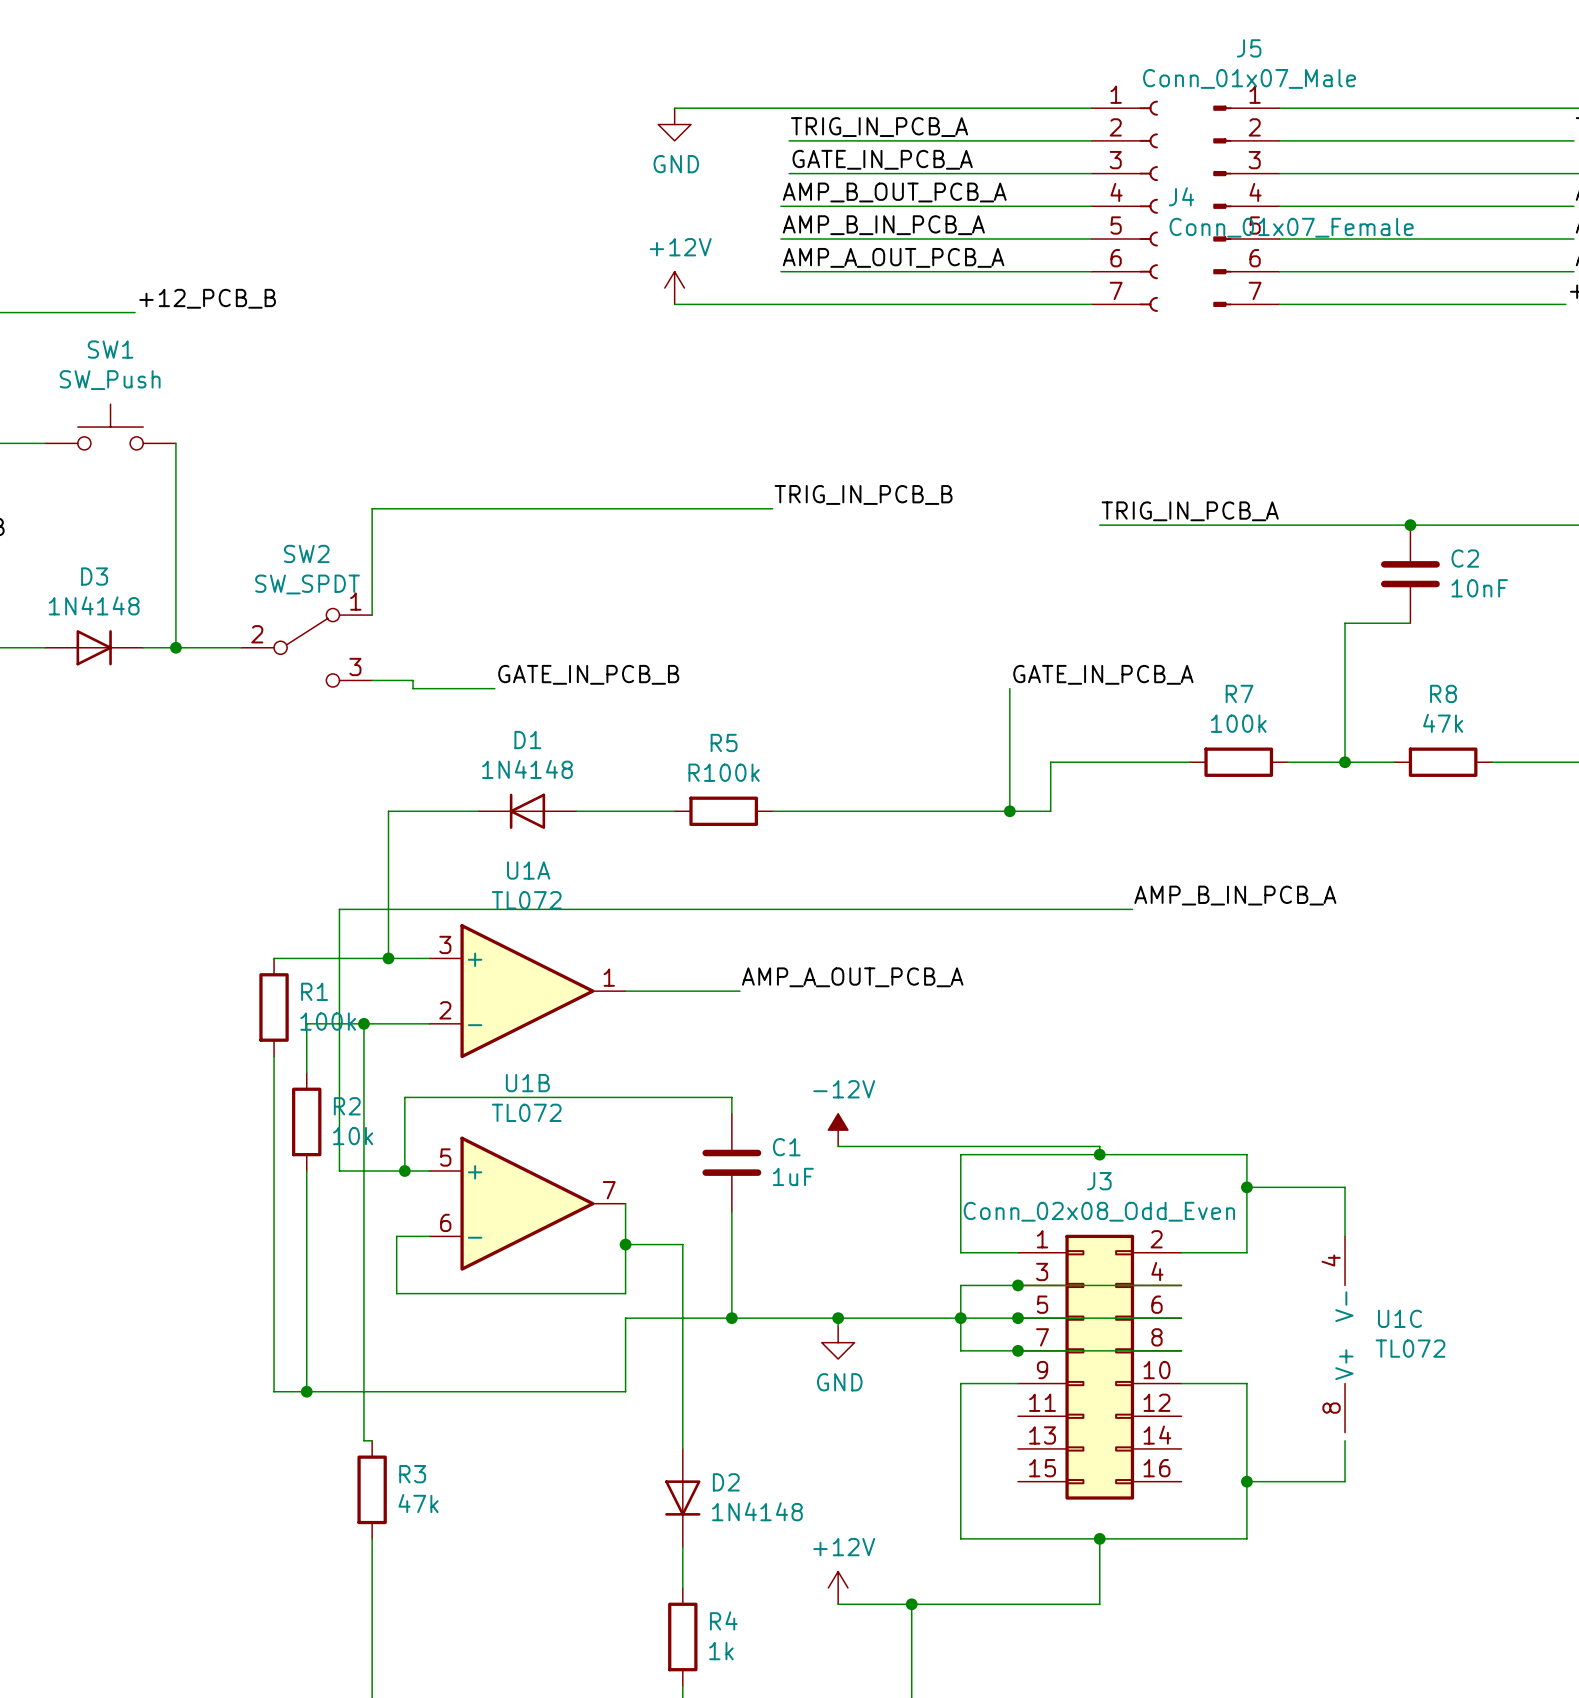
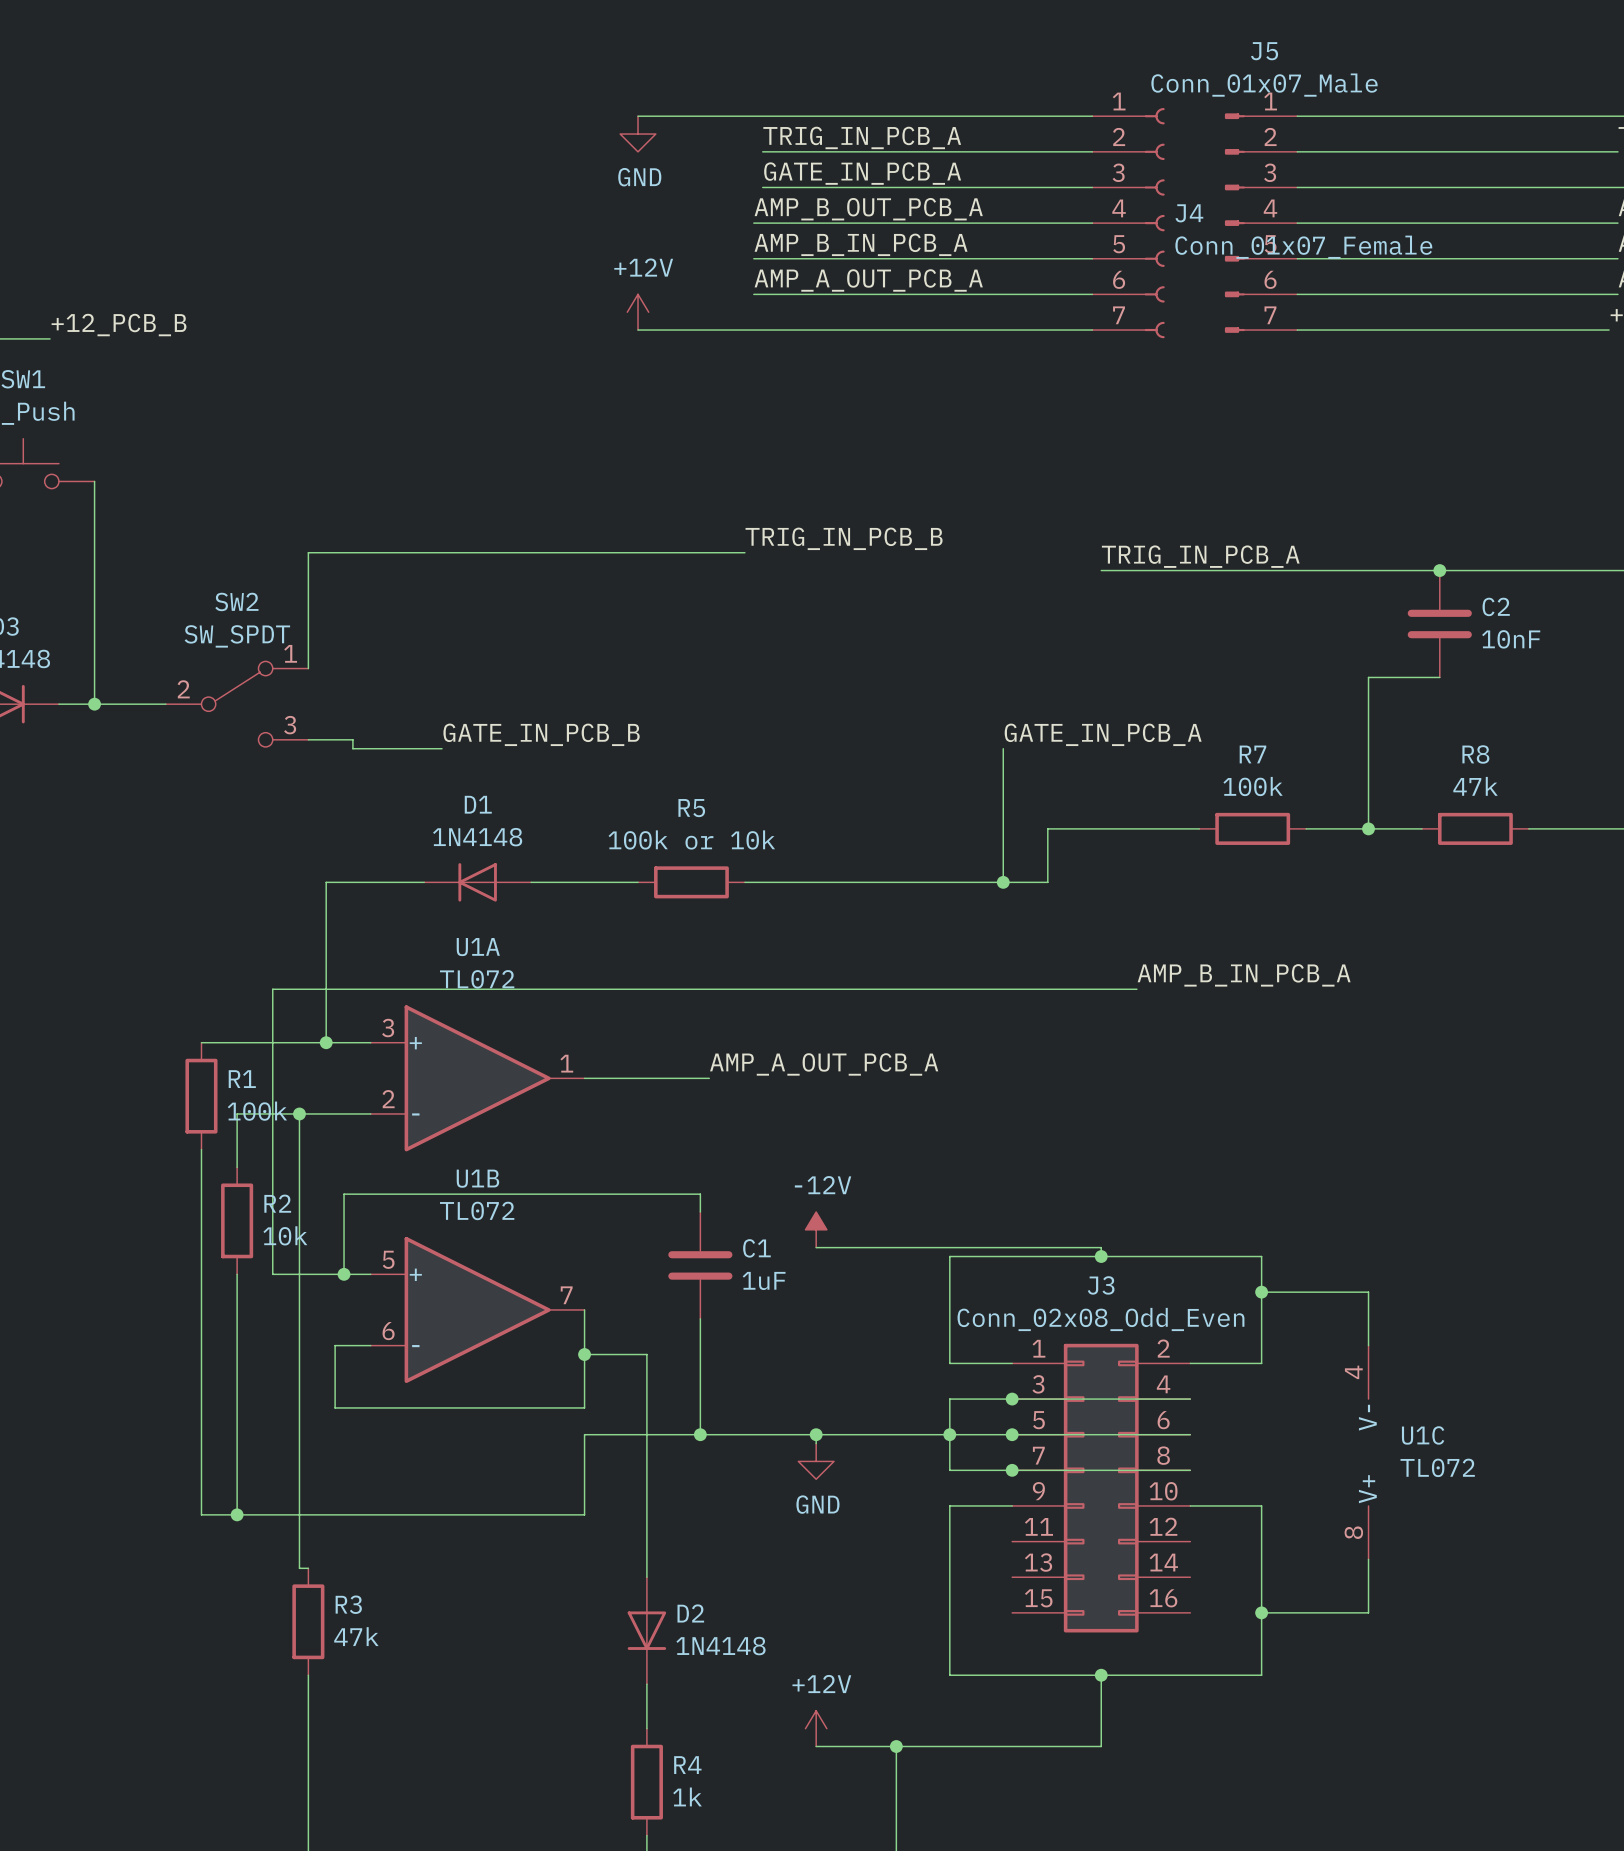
R5 value: R100k (724, 772) -> 100k or 10k (691, 839)
wire: none -> (1368, 1559) (1368, 1568)

